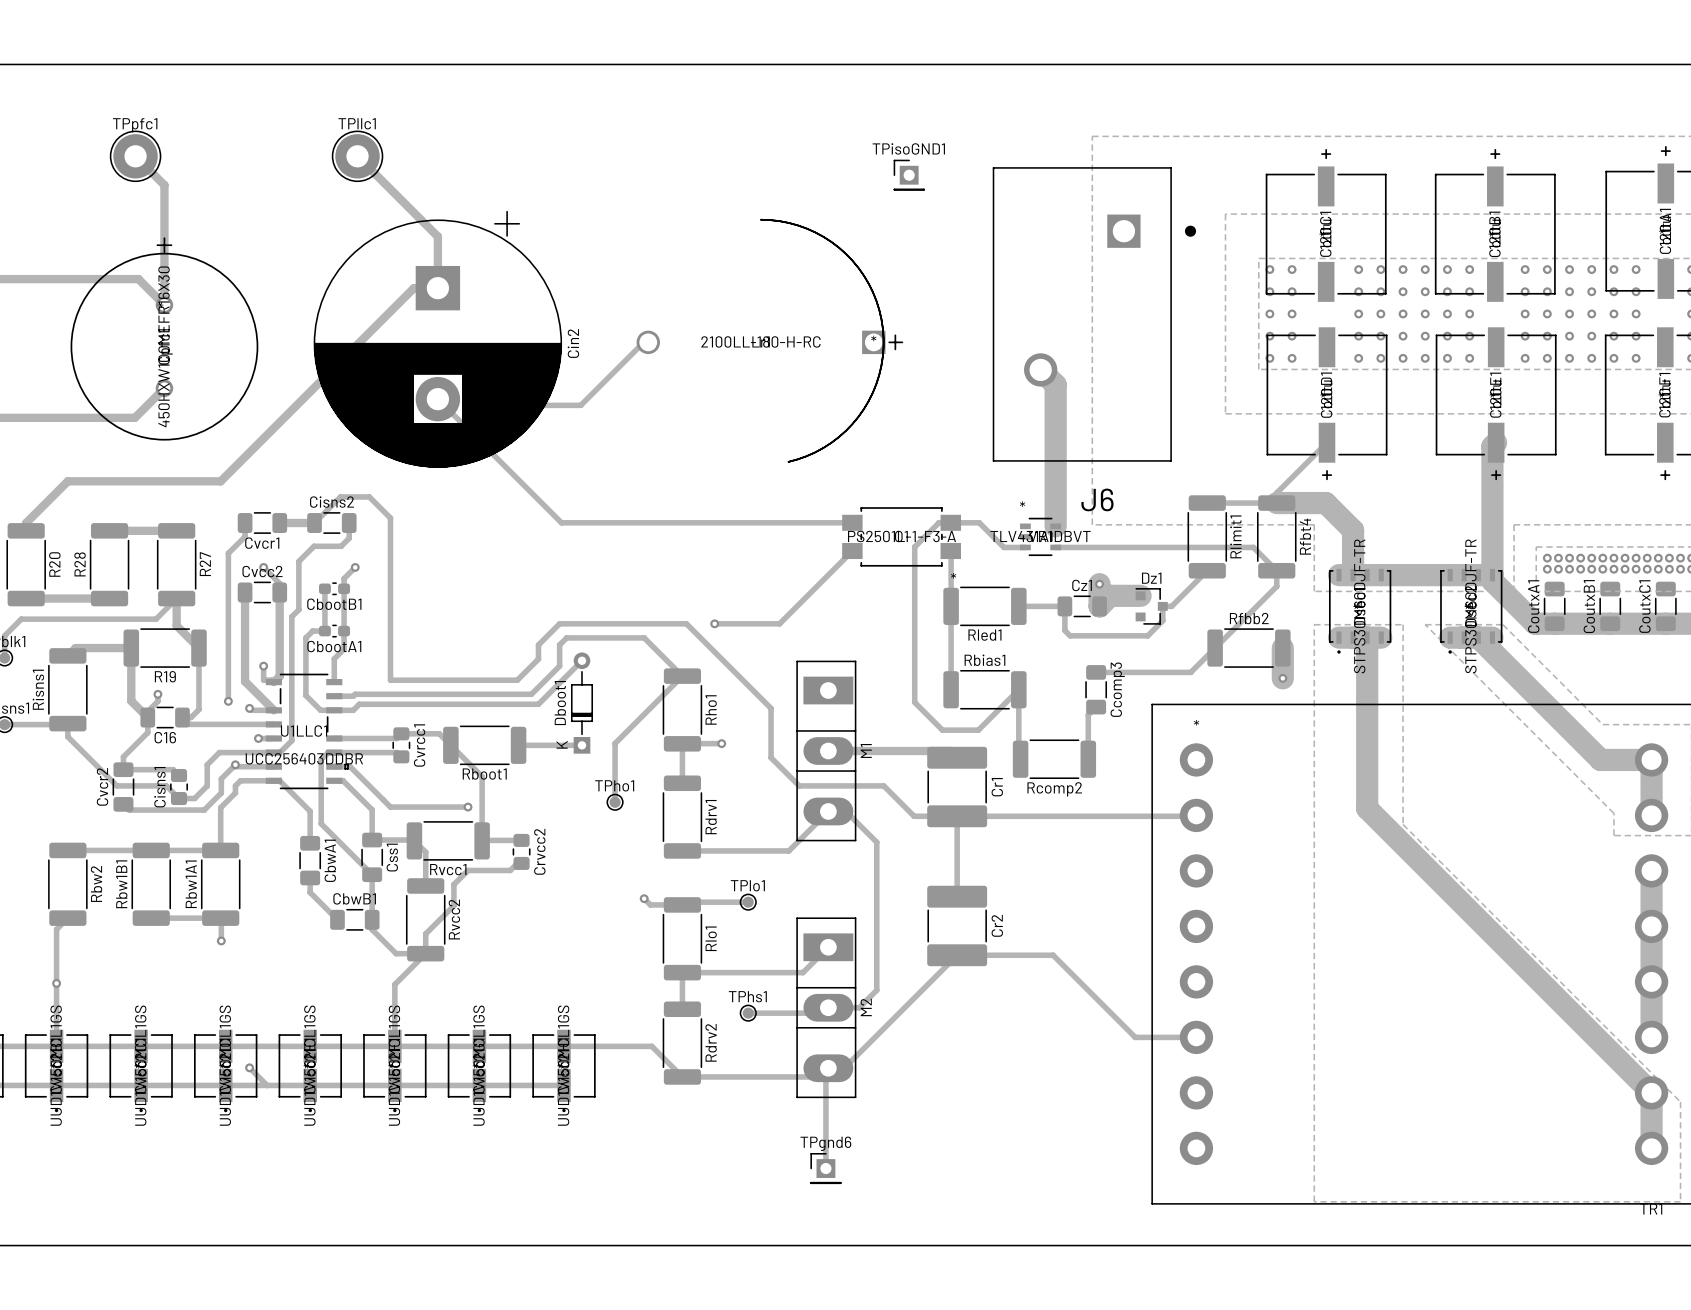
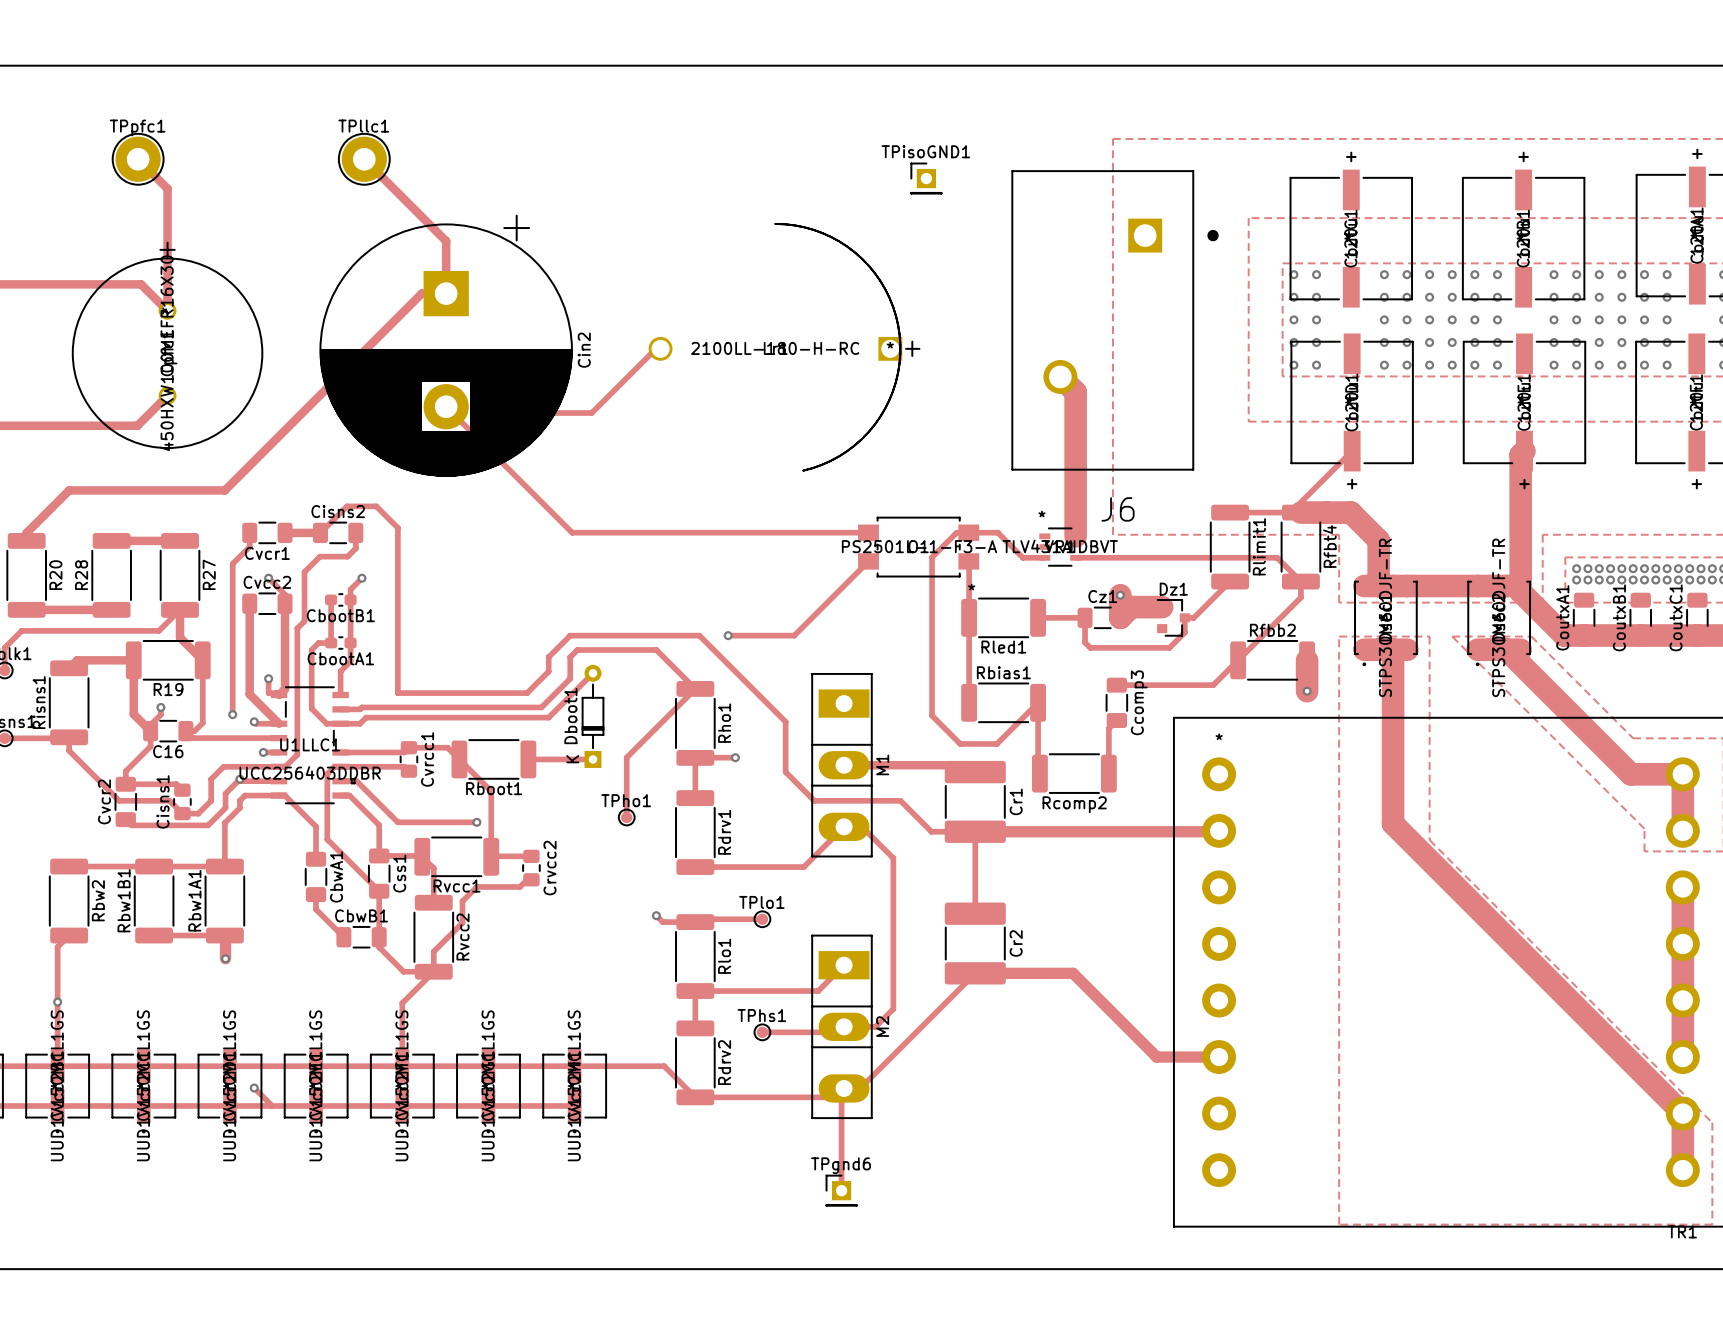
track width: thin (1196, 815) (957, 816) -> thick (1219, 830) (975, 831)
track width: thin (221, 918) (221, 940) -> thick (225, 936) (225, 958)
track width: thin (957, 955) (1053, 955) (1135, 1037) (1196, 1037) -> thick (975, 973) (1073, 973) (1156, 1057) (1219, 1057)

